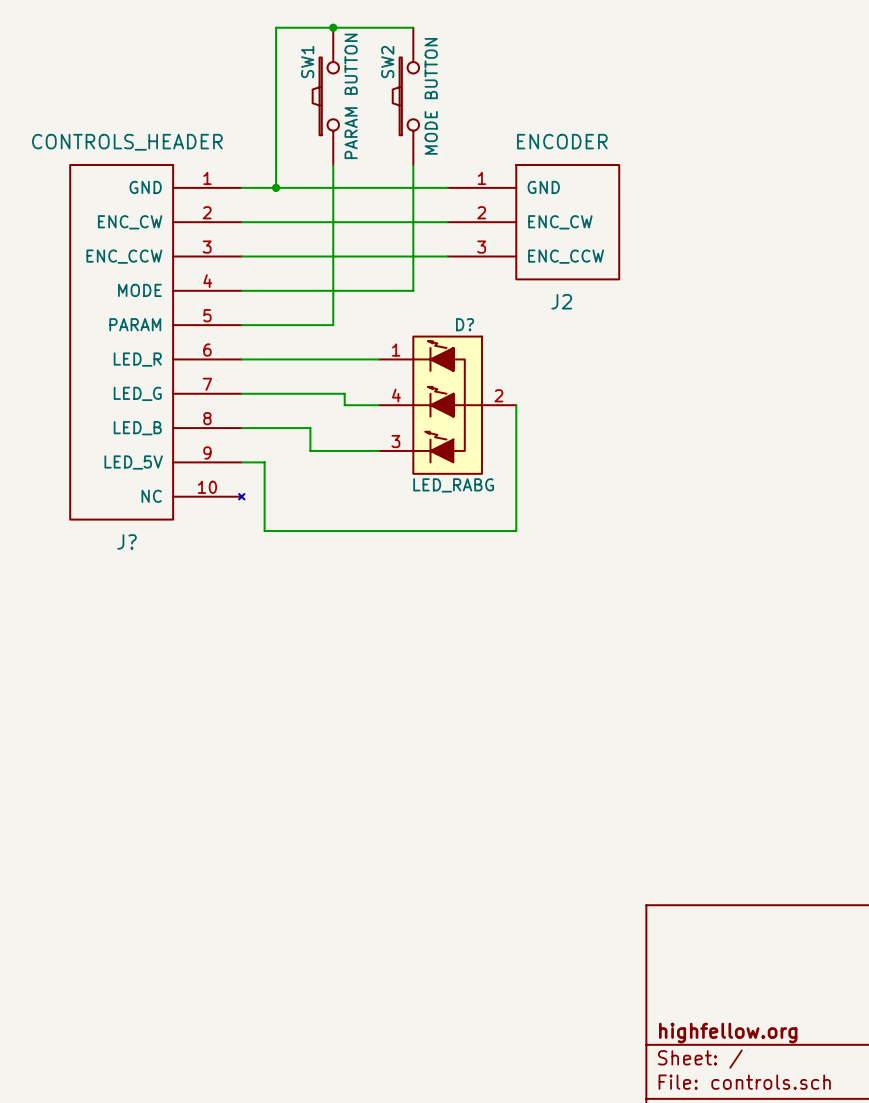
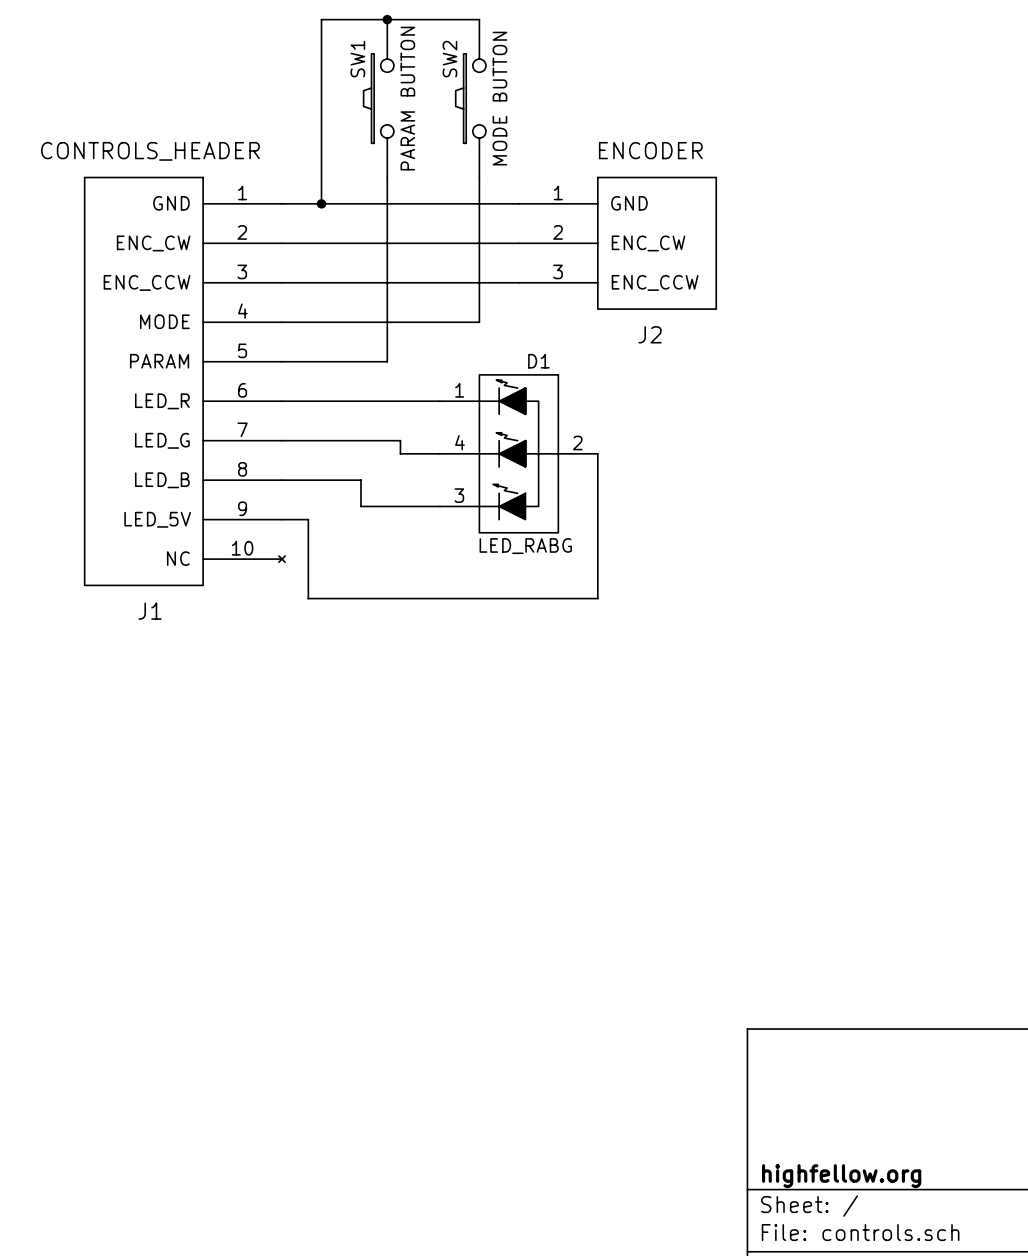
D? name: D? (465, 324) -> D1 (538, 361)
J? name: J? (127, 541) -> J1 (150, 611)

